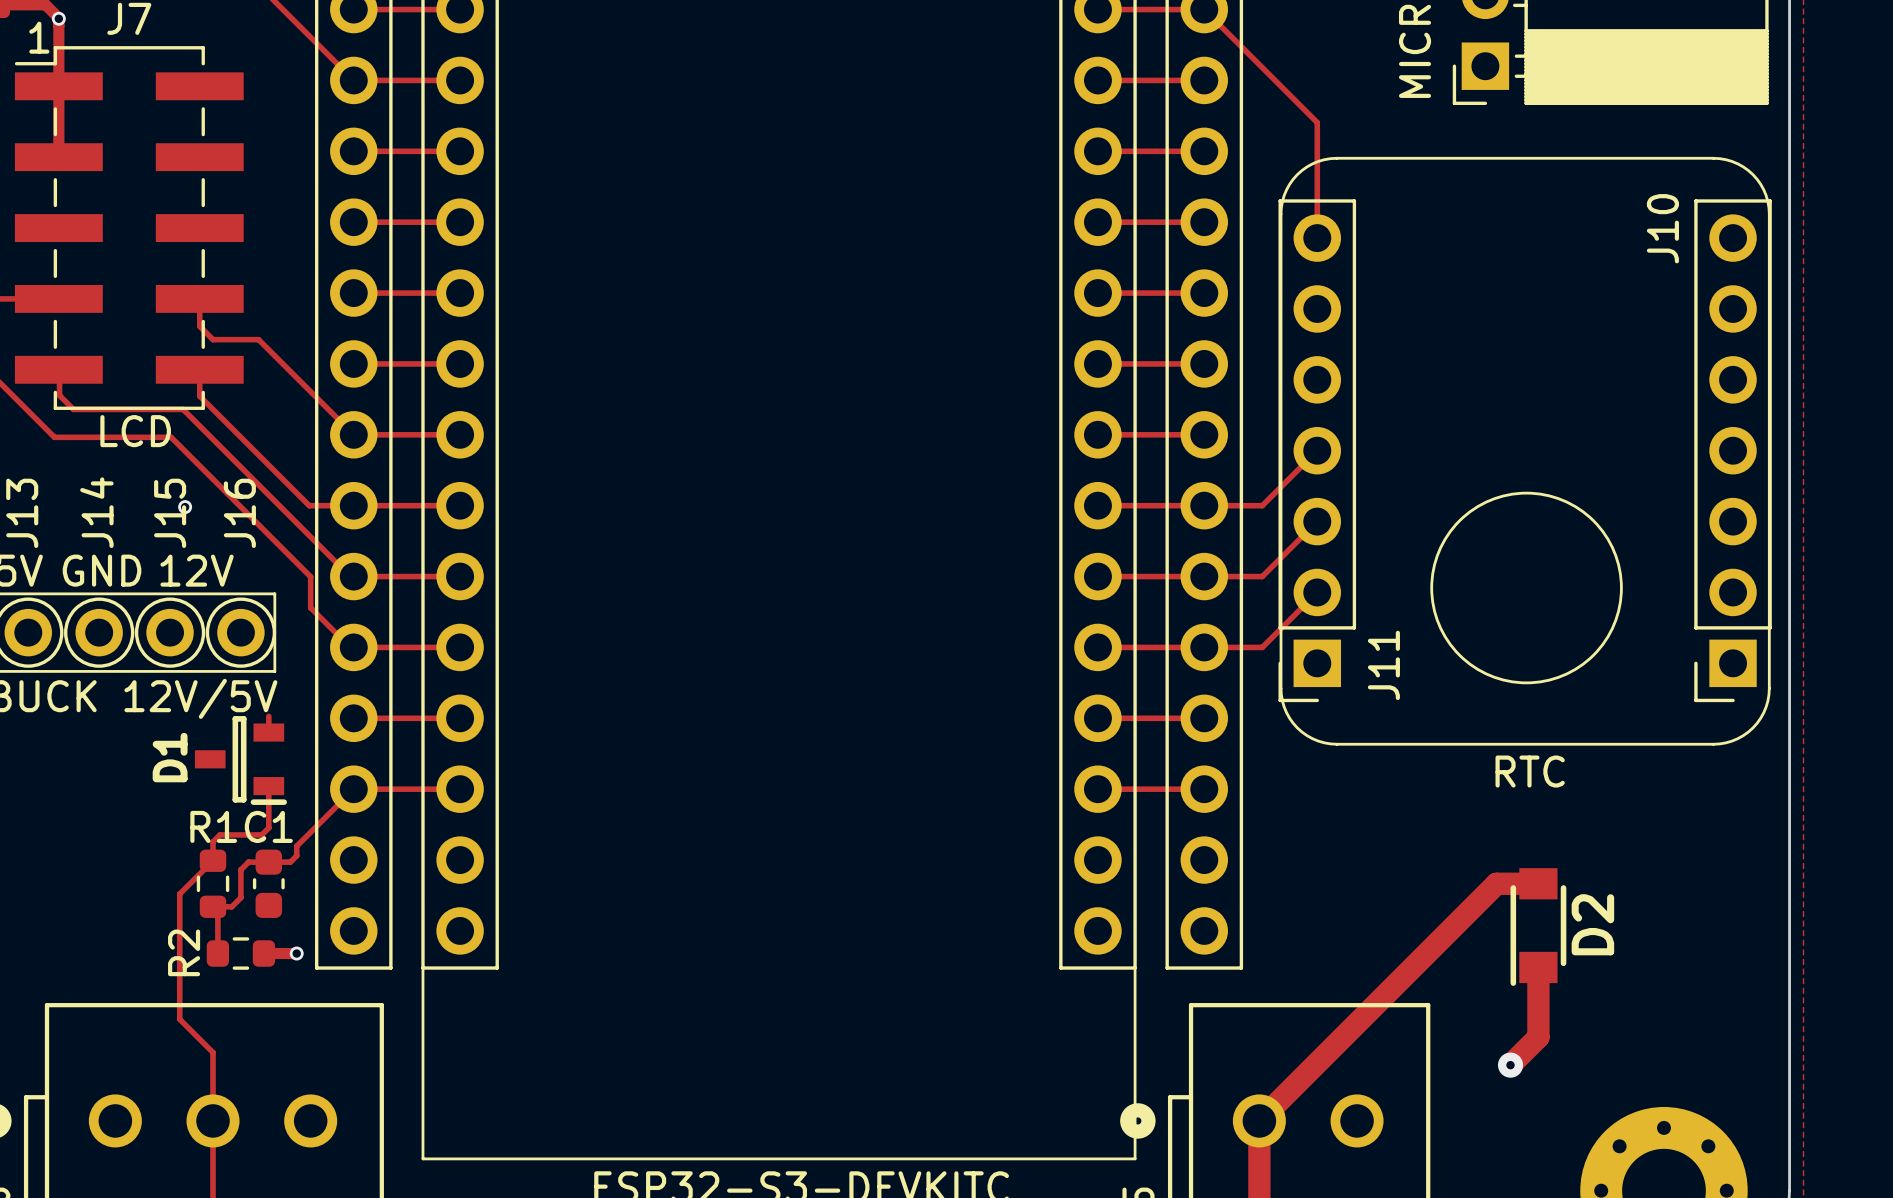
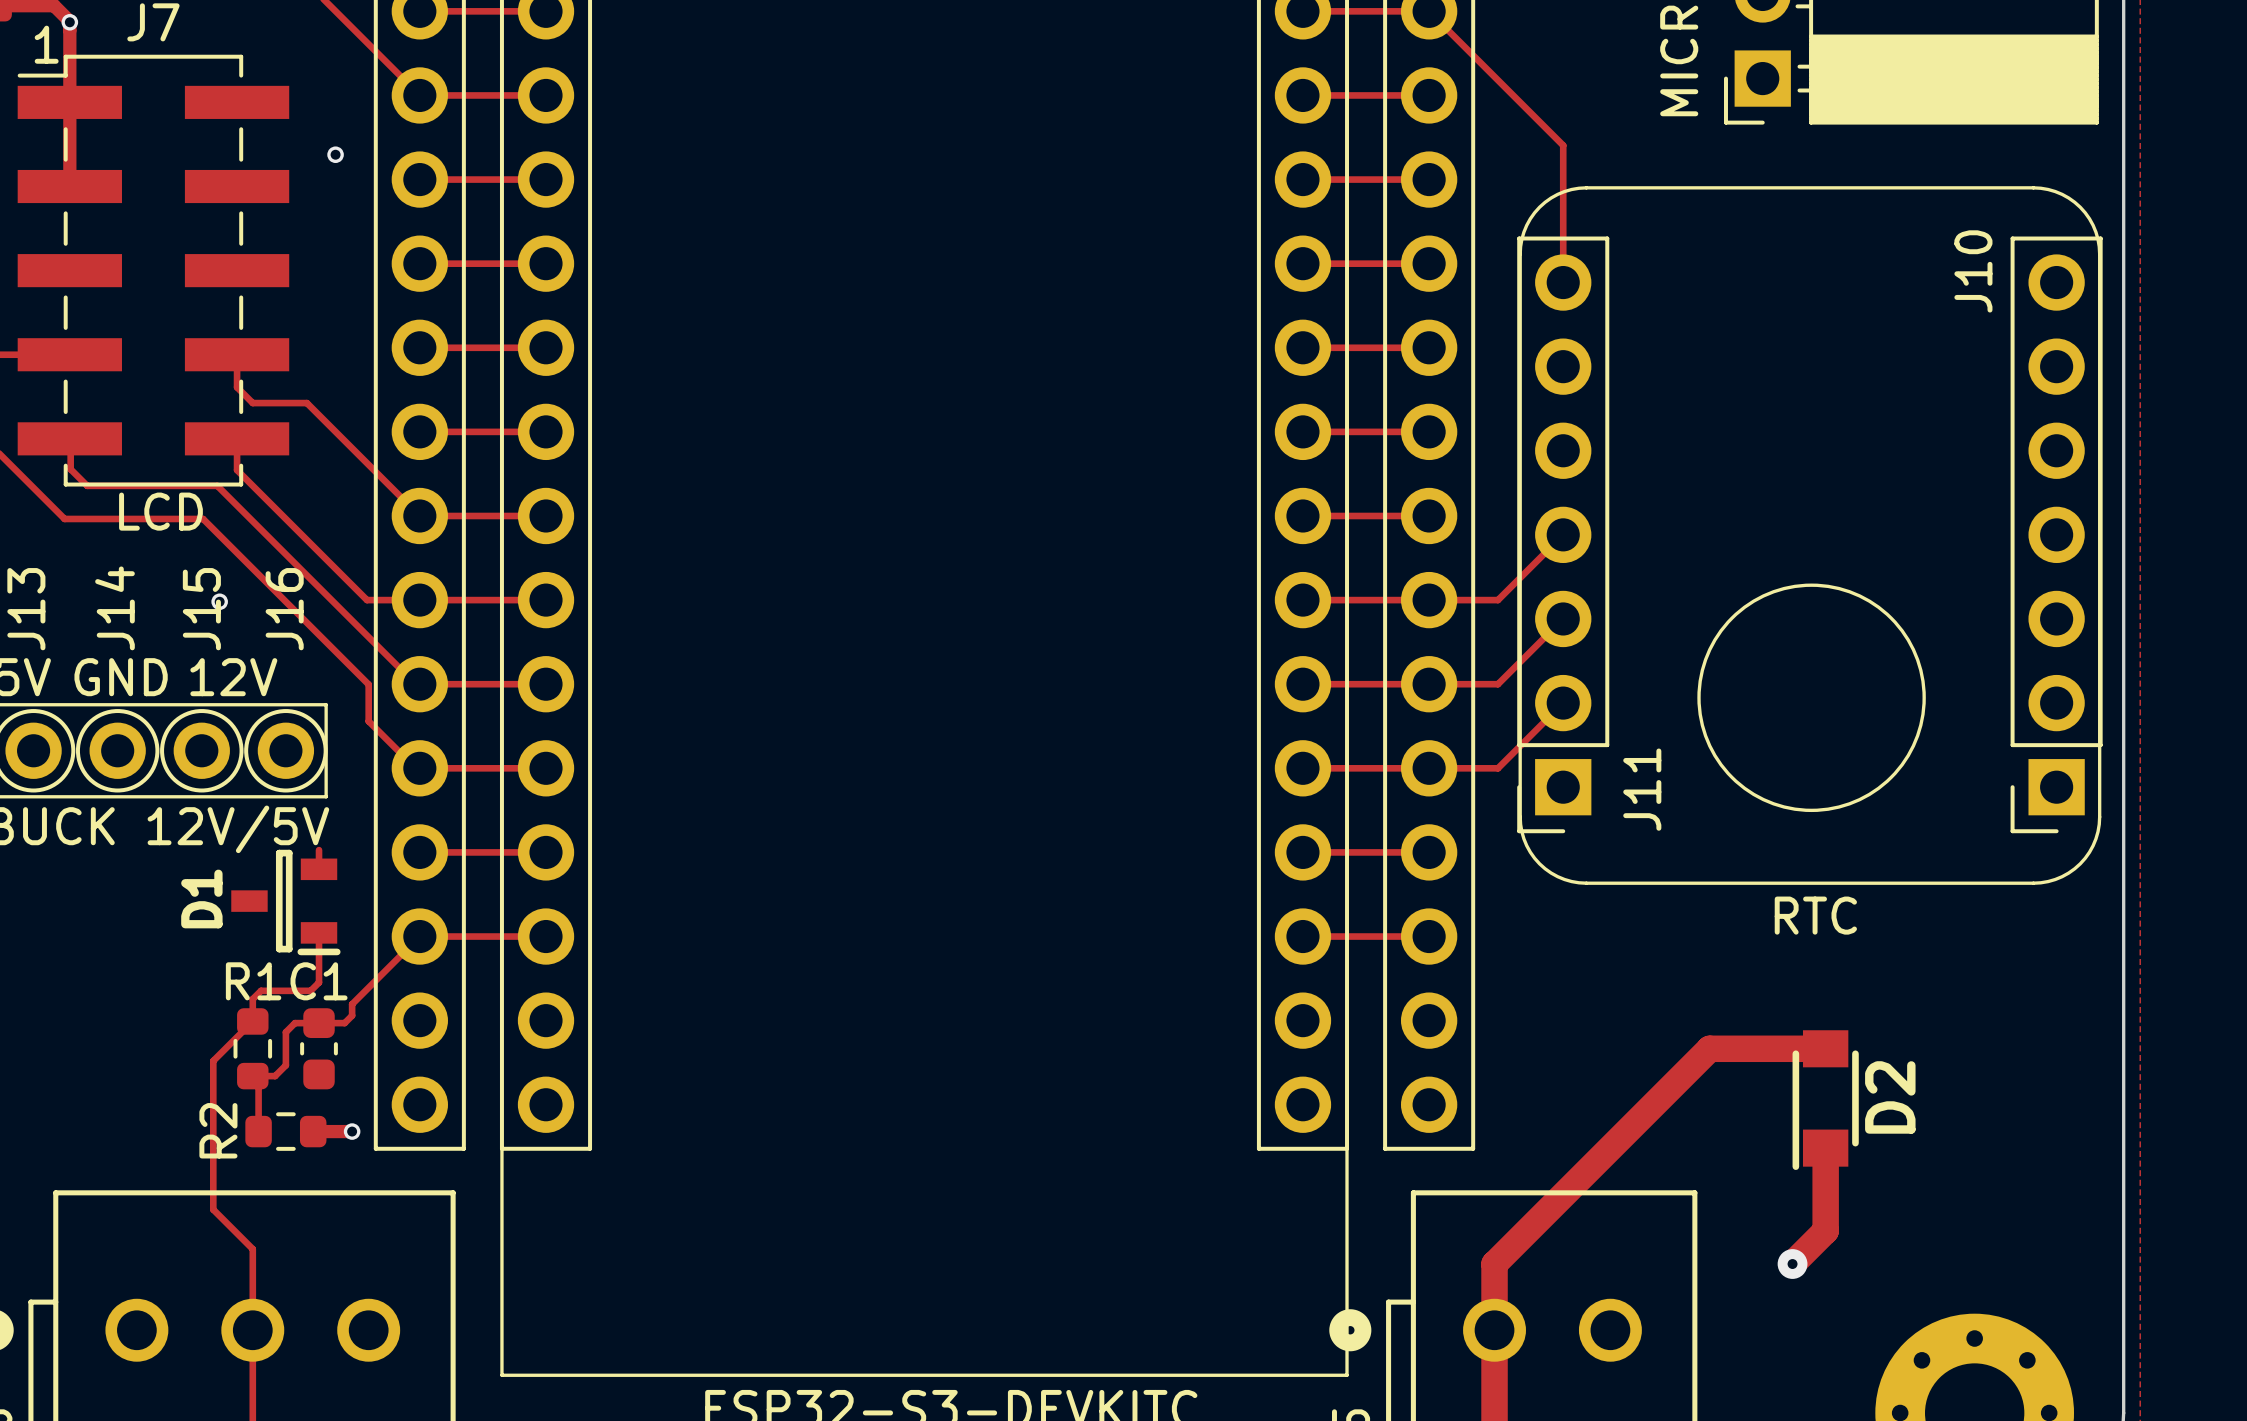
via: none -> (335, 154)
track: (1496, 883) (1259, 1120) -> (1775, 1048) (1709, 1048) (1494, 1264) (1494, 1330)

